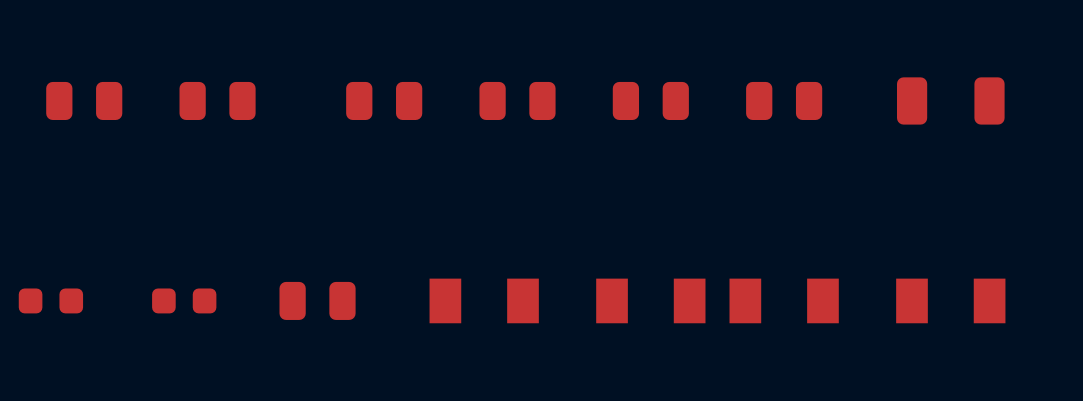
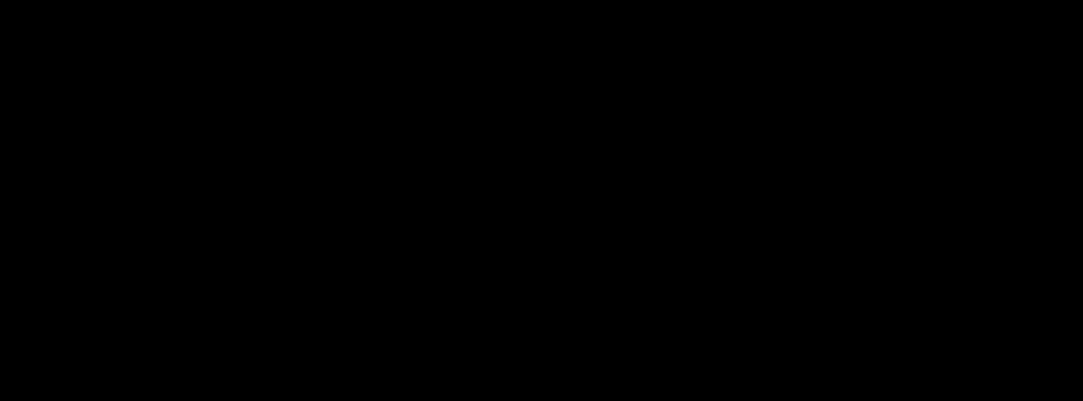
part: (84, 100) -> none
part: (217, 100) -> none
part: (384, 100) -> none
part: (517, 100) -> none
part: (650, 100) -> none
part: (784, 100) -> none
part: (950, 100) -> none
part: (50, 300) -> none
part: (184, 300) -> none
part: (317, 300) -> none
part: (484, 300) -> none
part: (650, 300) -> none
part: (784, 300) -> none
part: (950, 300) -> none

